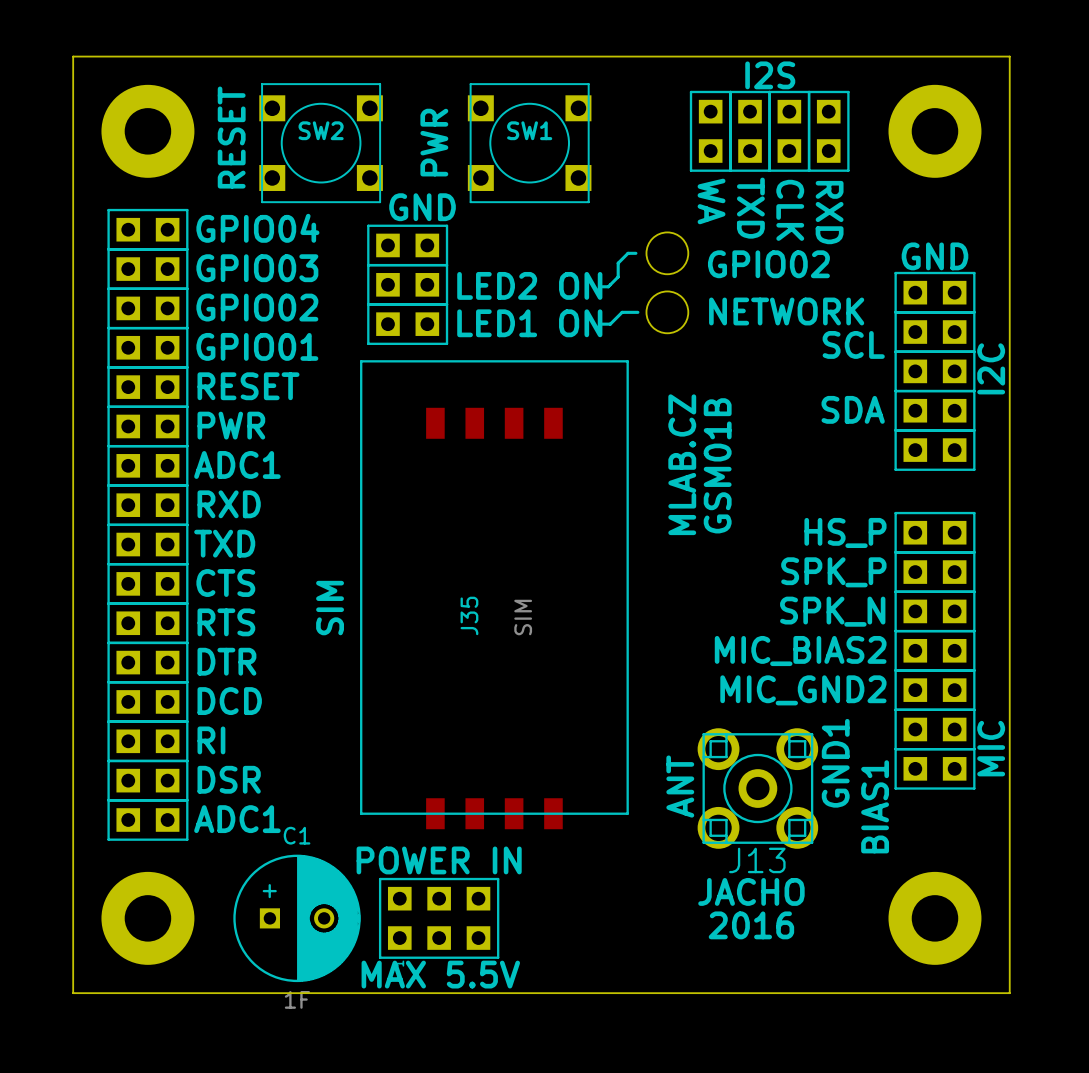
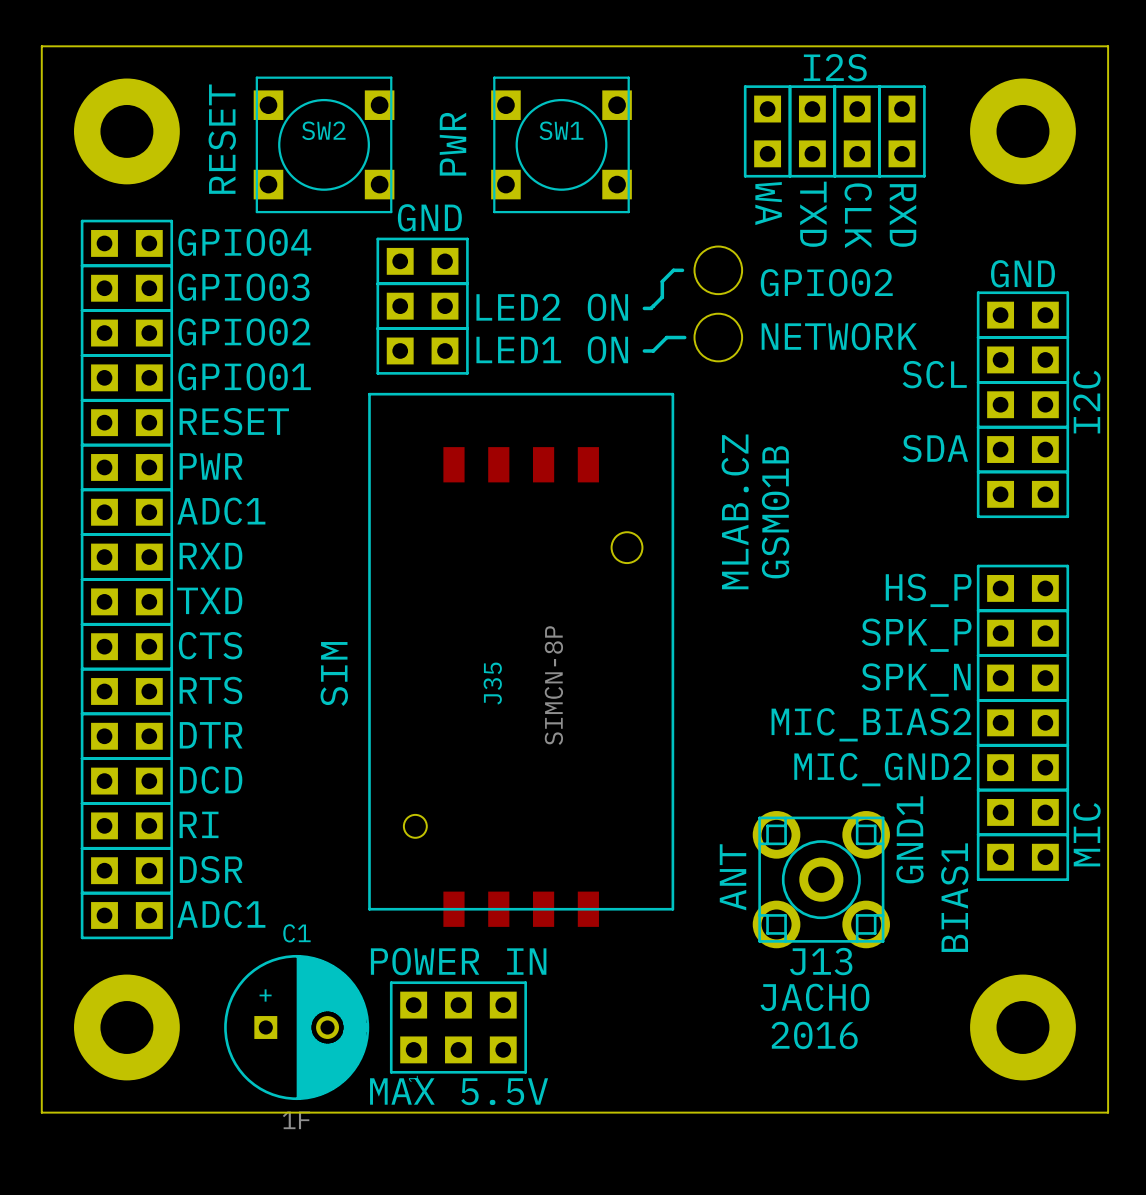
J35 footprint: [360, 360, 629, 830] -> [368, 392, 675, 927]
J35 value: SIM (523, 617) -> SIMCN-8P (553, 685)

